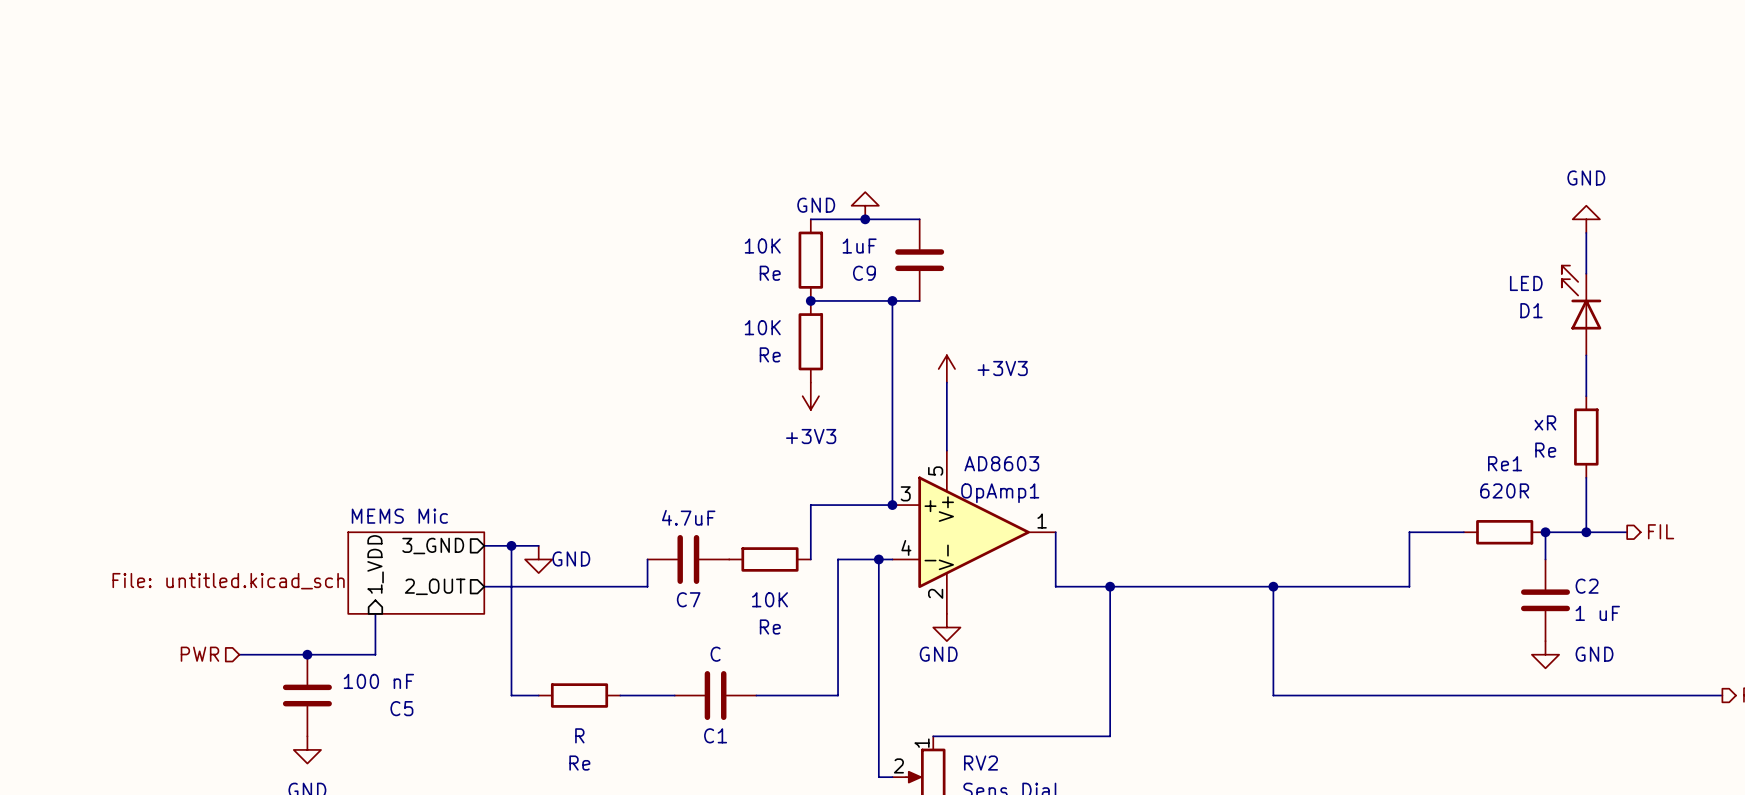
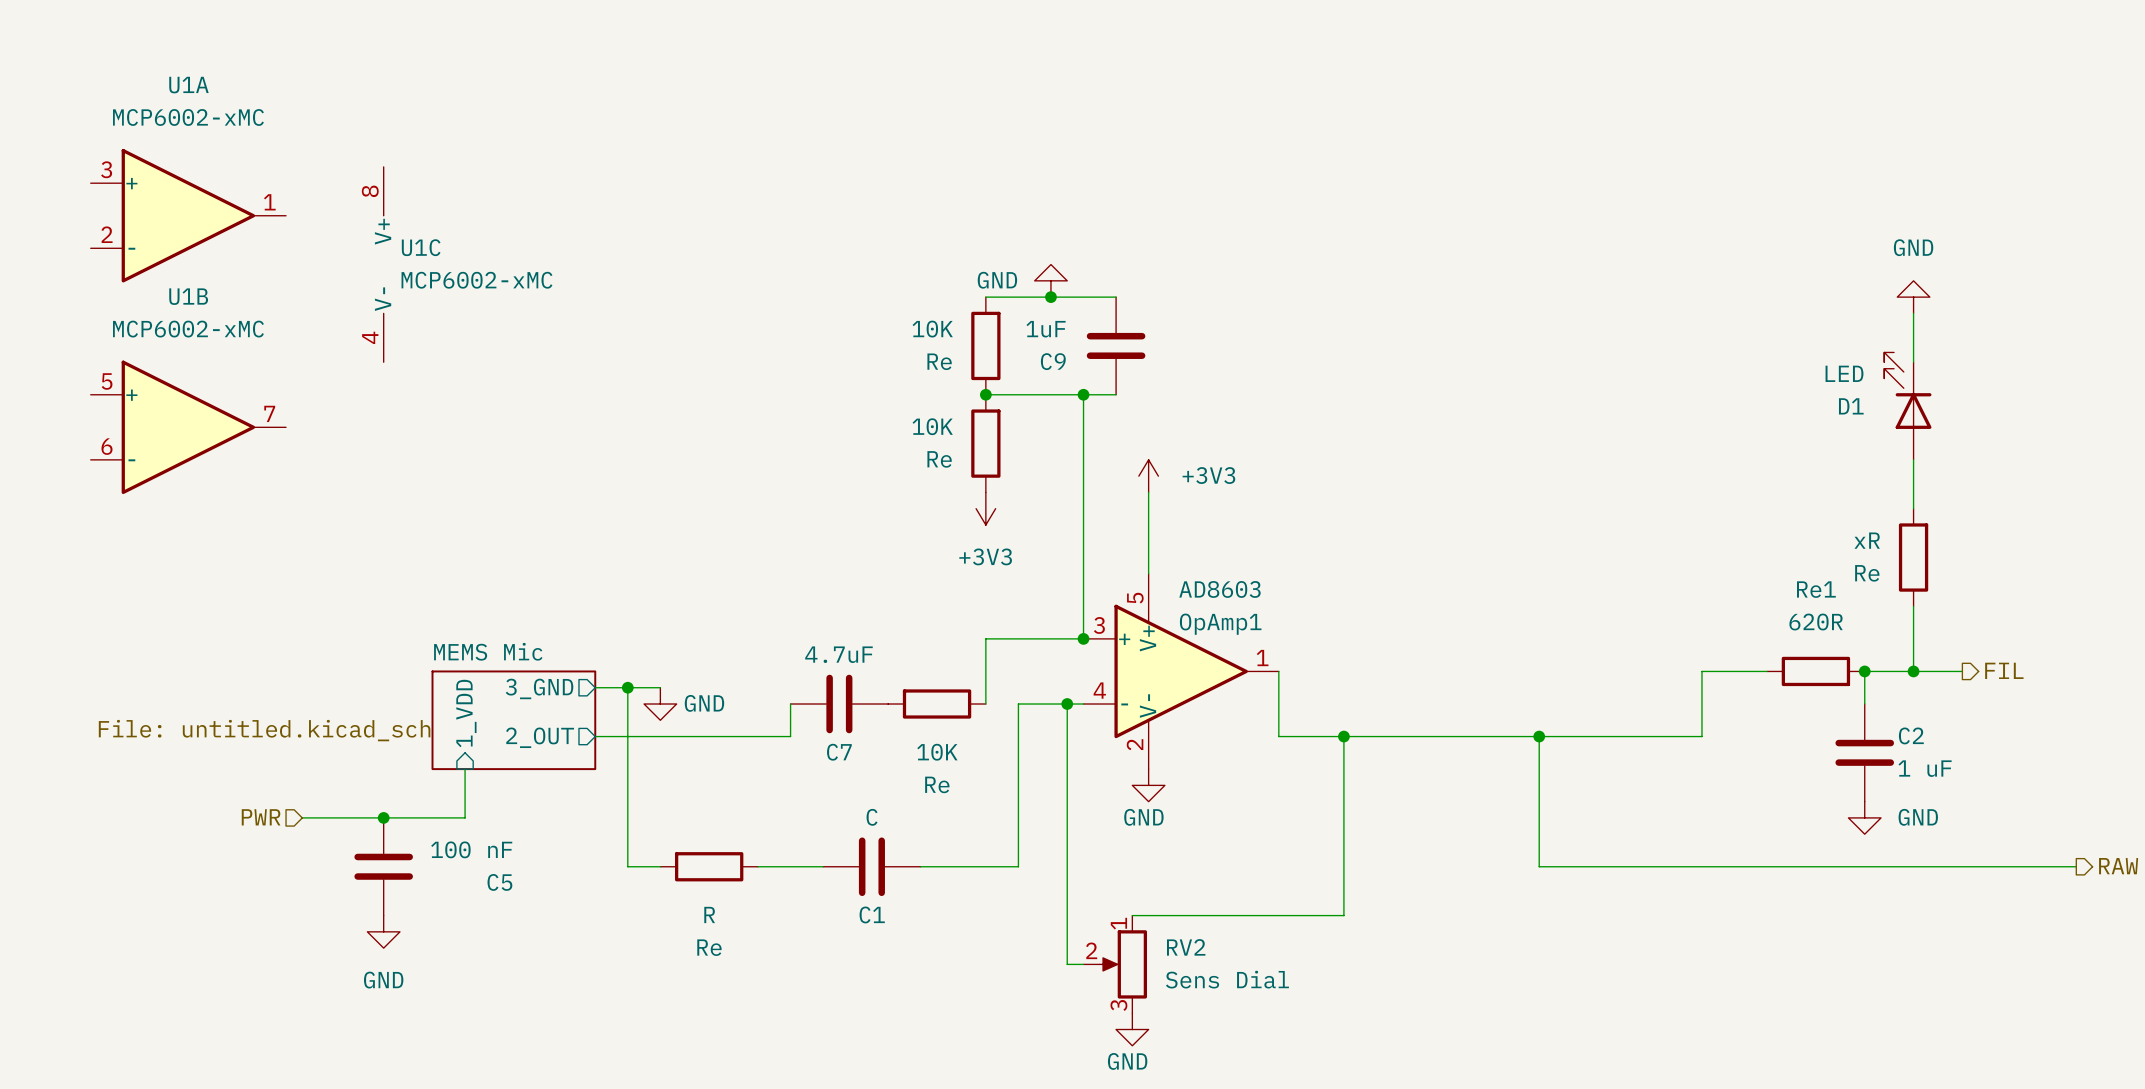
U1A: none -> MCP6002-xMC (188, 215)
U1C: none -> MCP6002-xMC (383, 264)
U1B: none -> MCP6002-xMC (188, 427)

